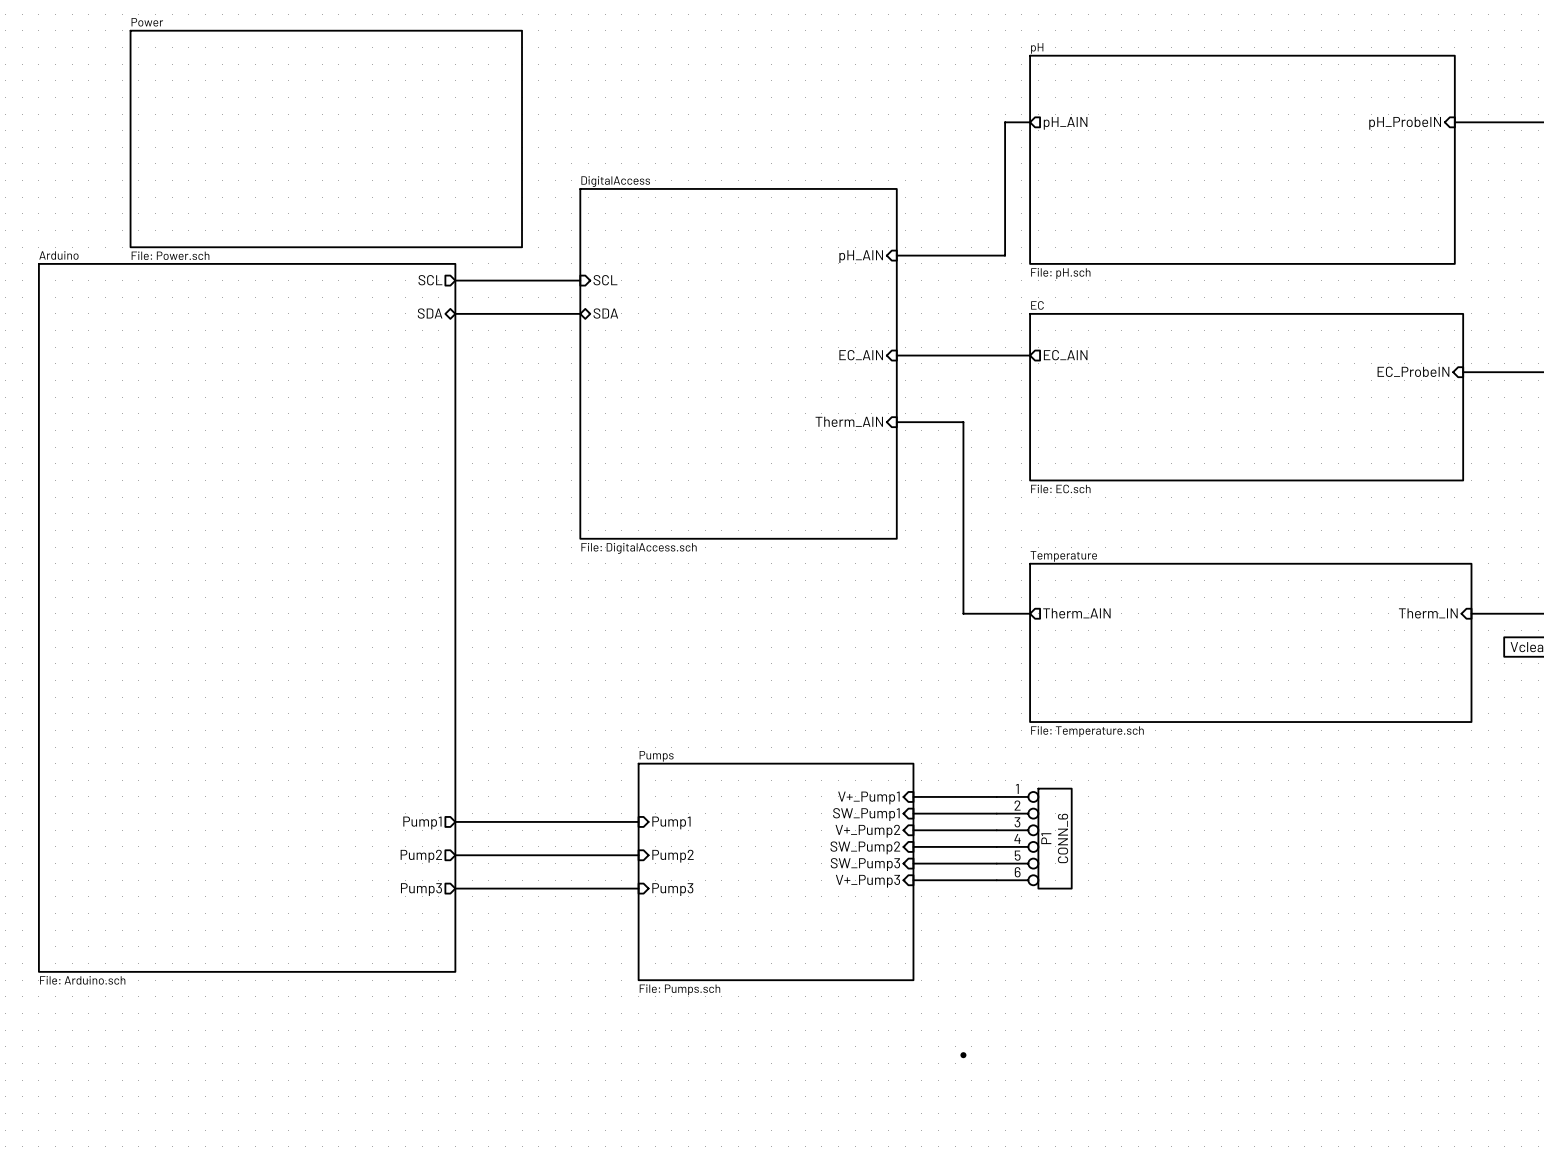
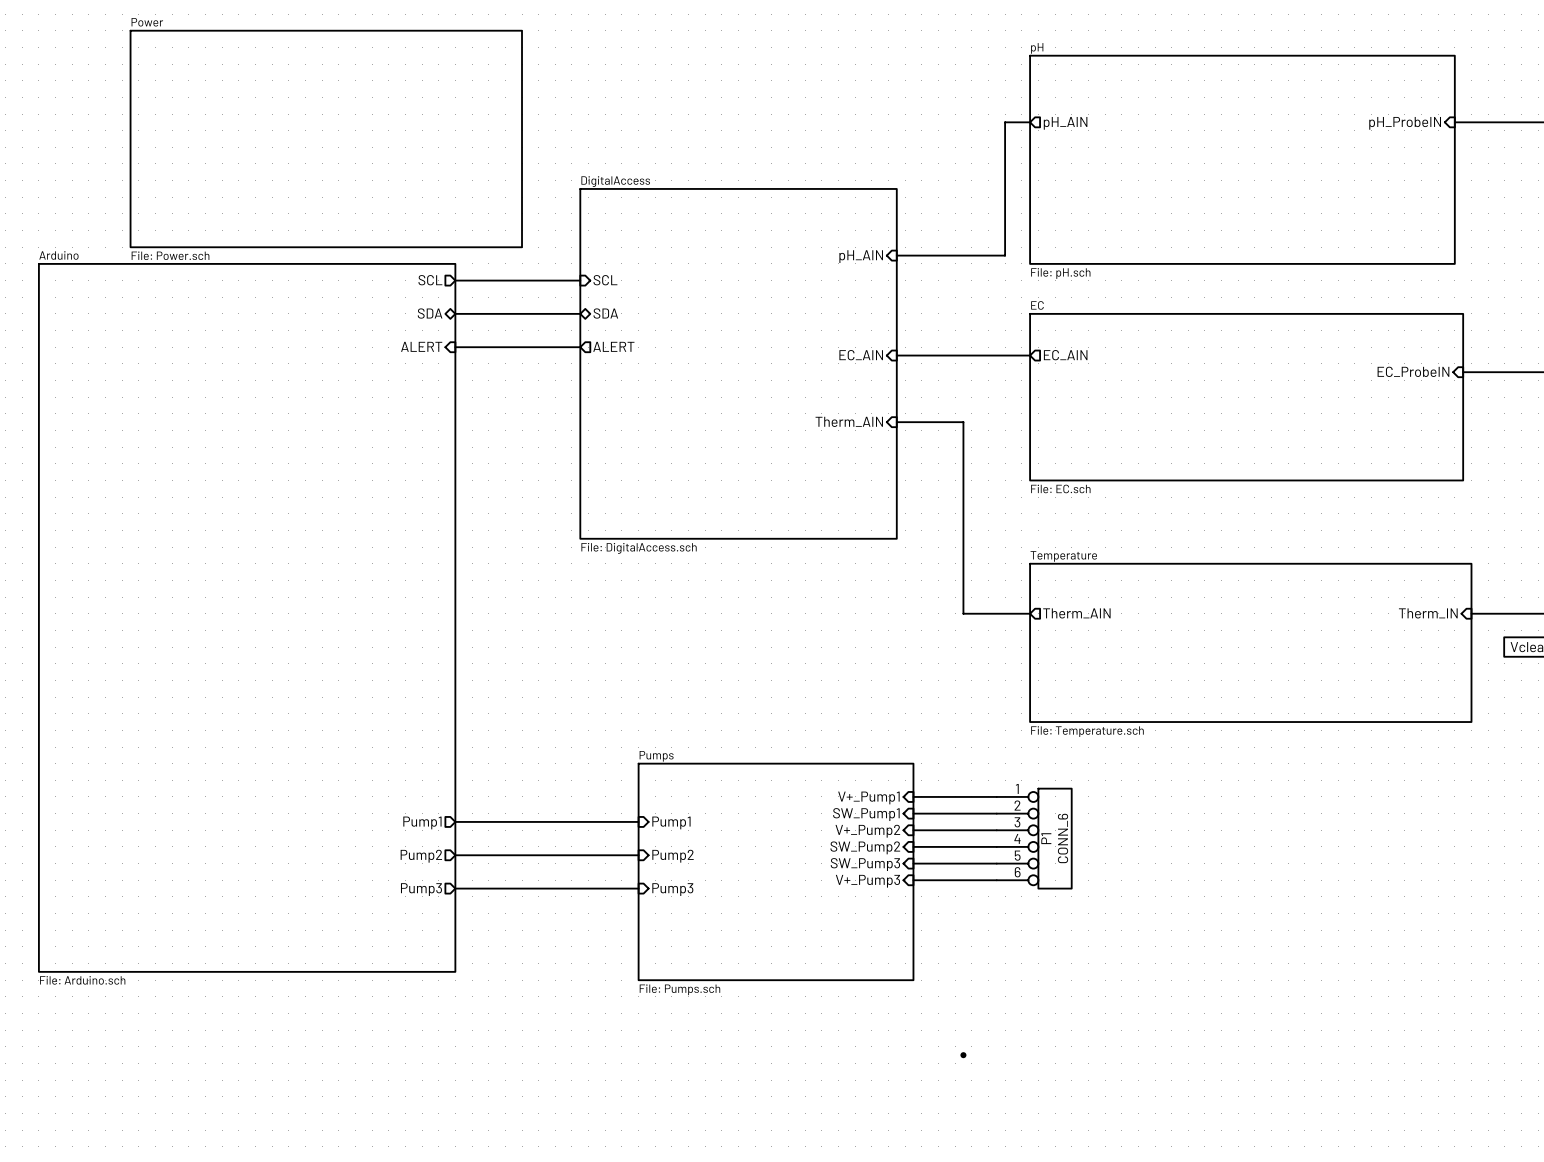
sheet pin: none -> ALERT (421, 346)
sheet pin: none -> ALERT (613, 346)
wire: none -> (455, 347) (580, 347)

